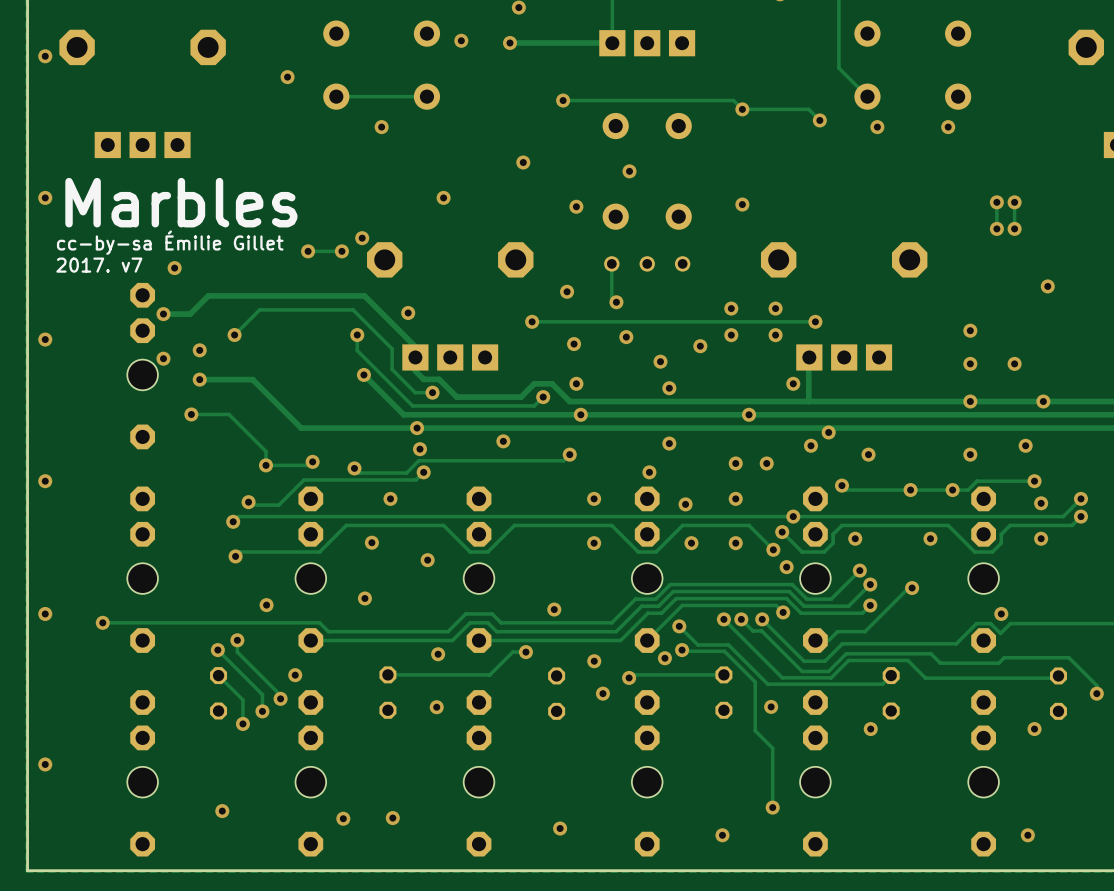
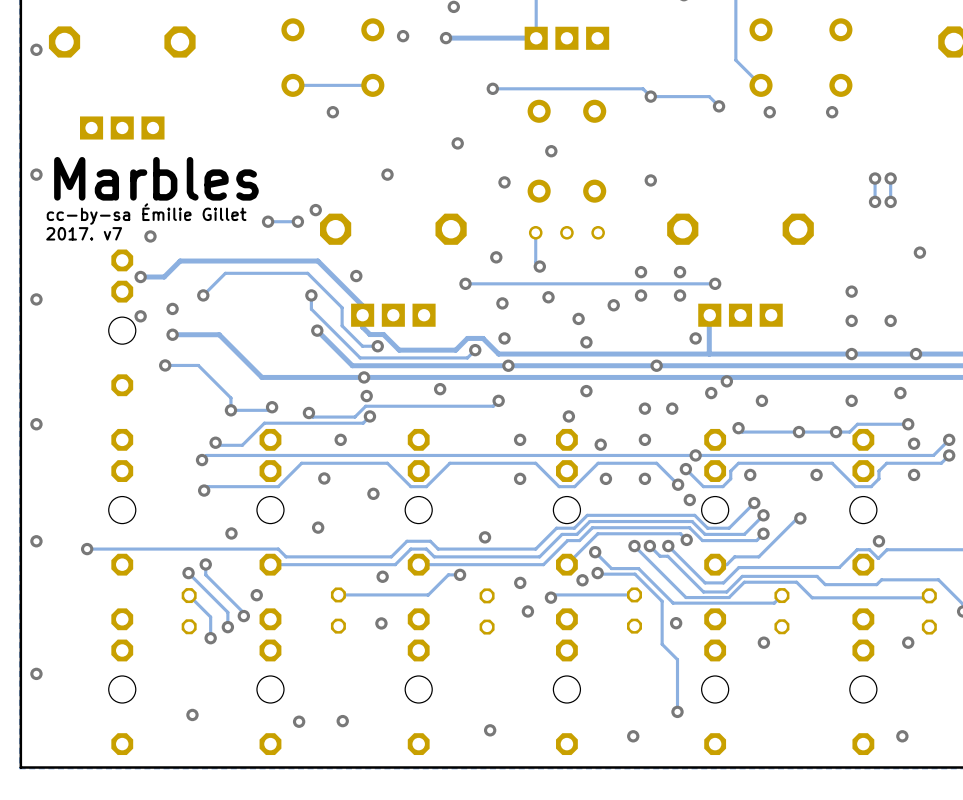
via: (287, 77) -> none

